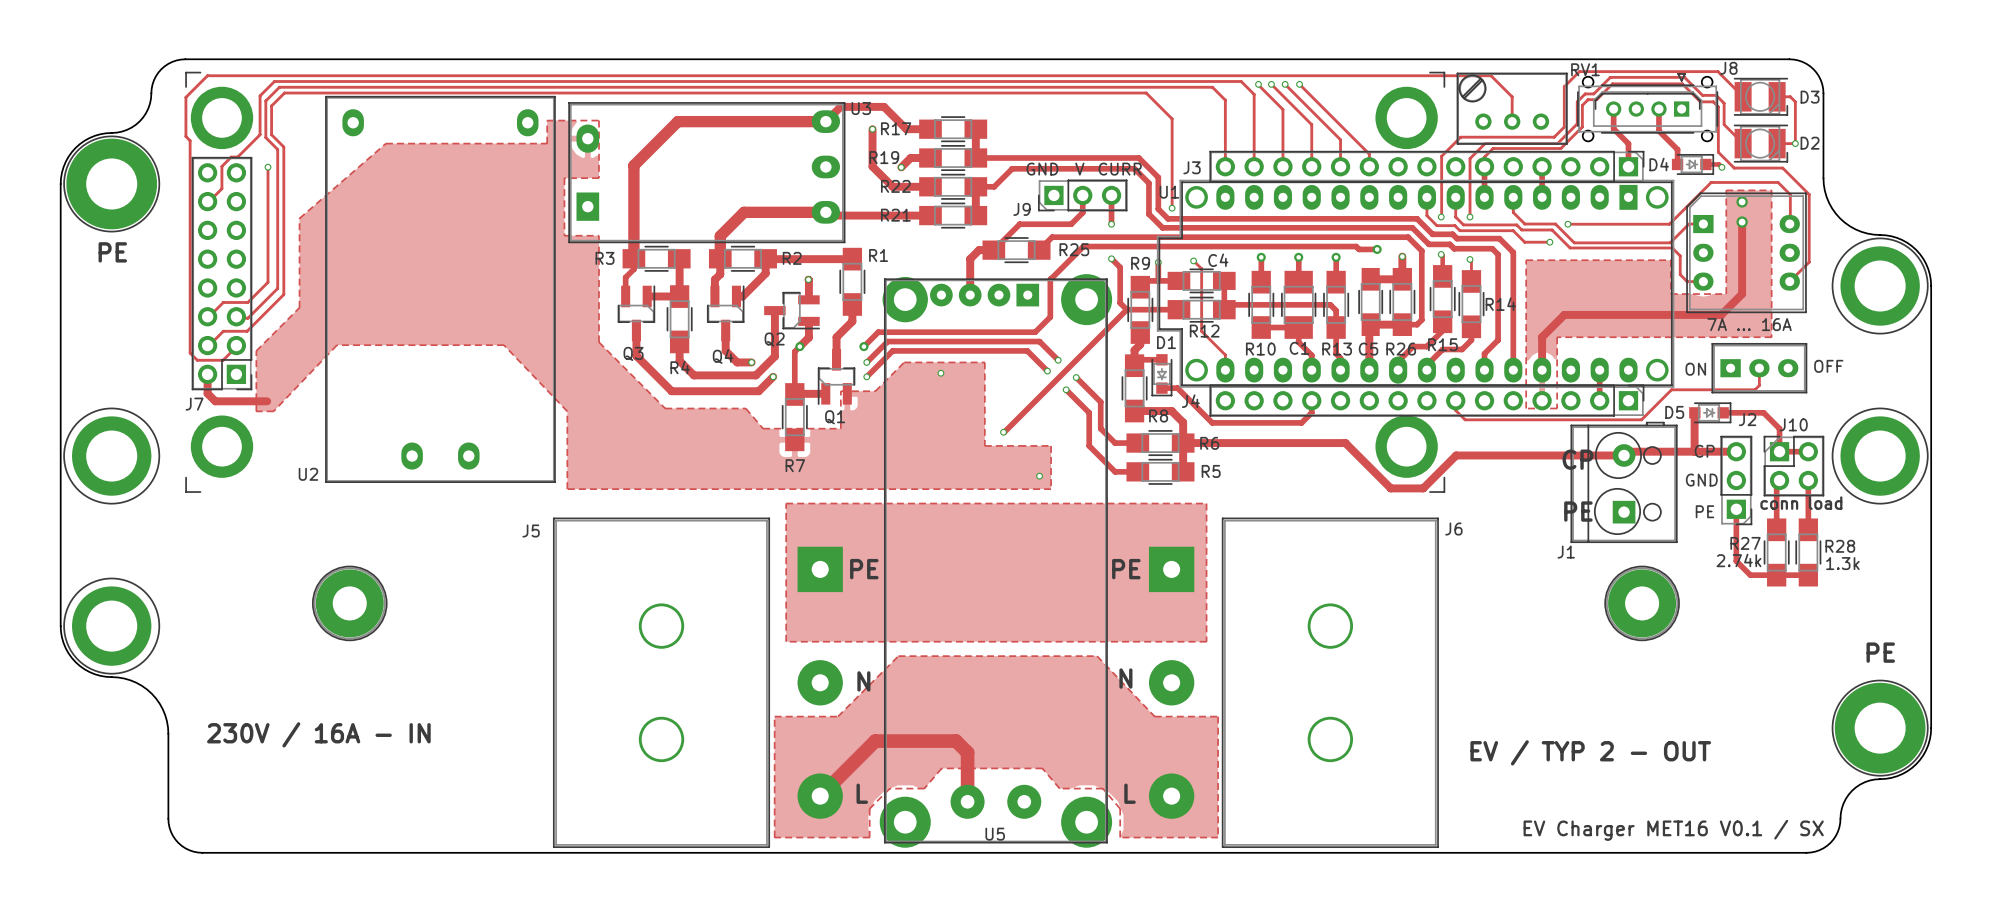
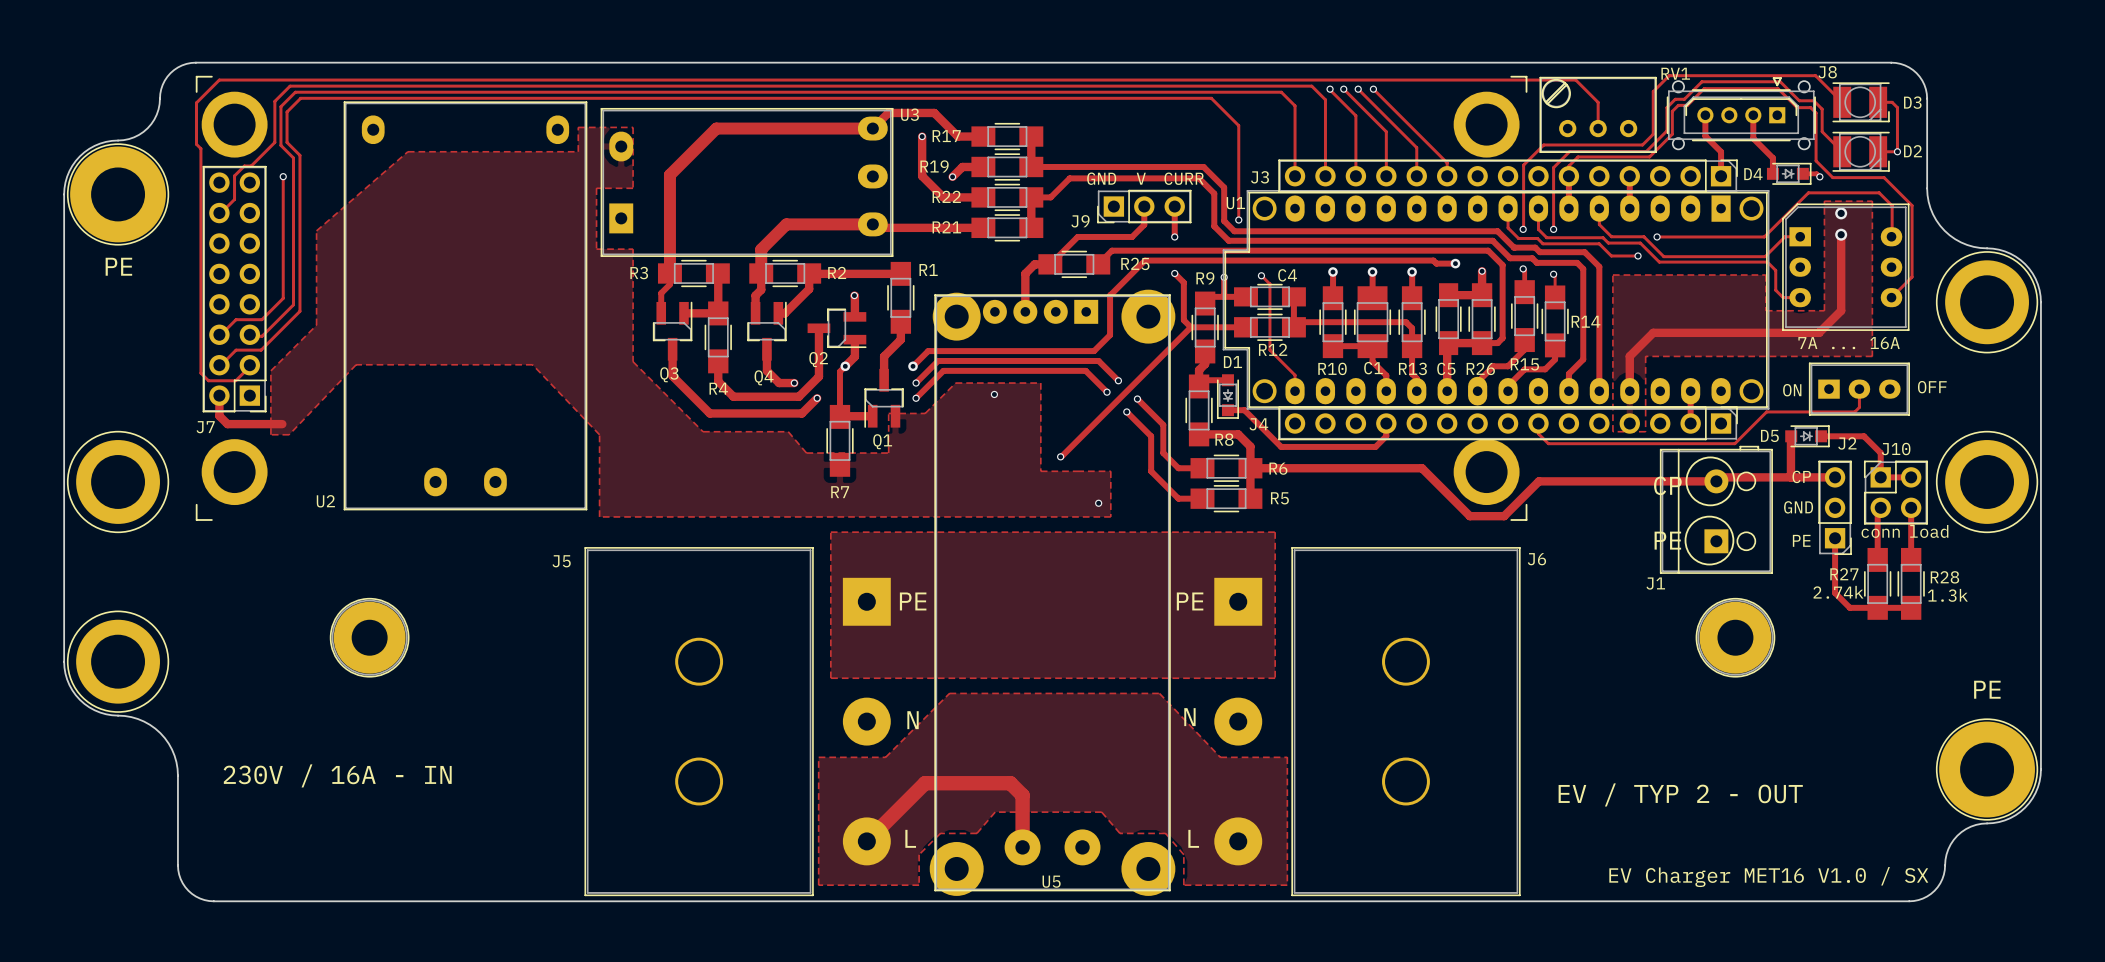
text: EV Charger MET16 V0.1 / SX (1673, 830) -> EV Charger MET16 V1.0 / SX (1768, 877)

